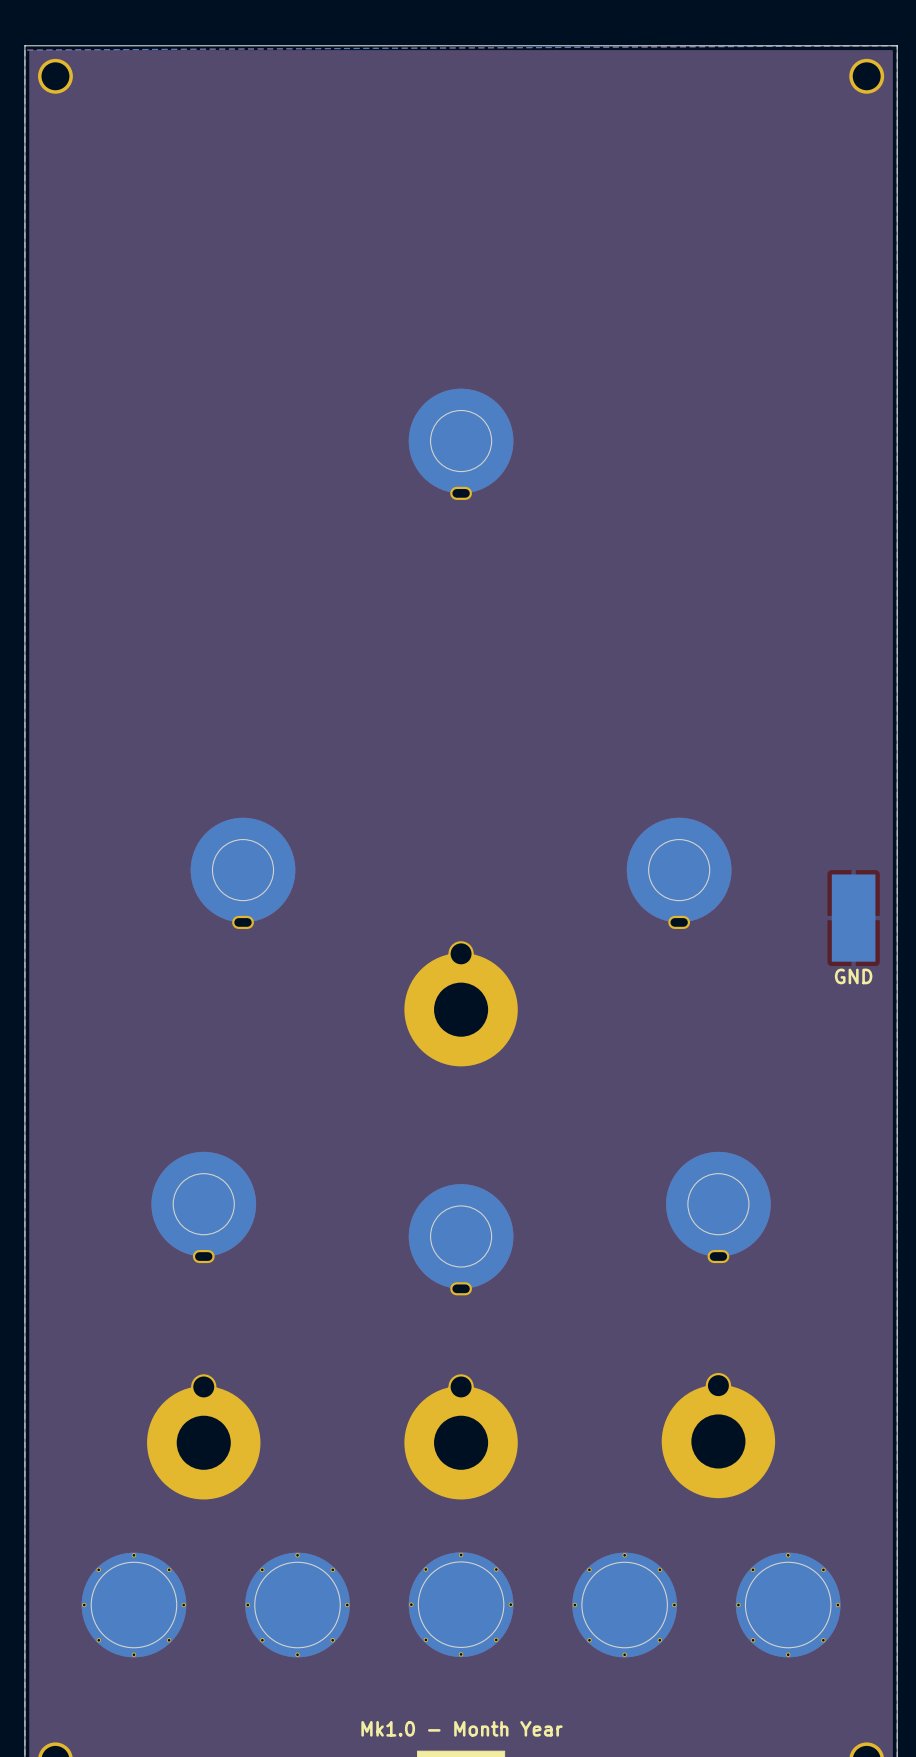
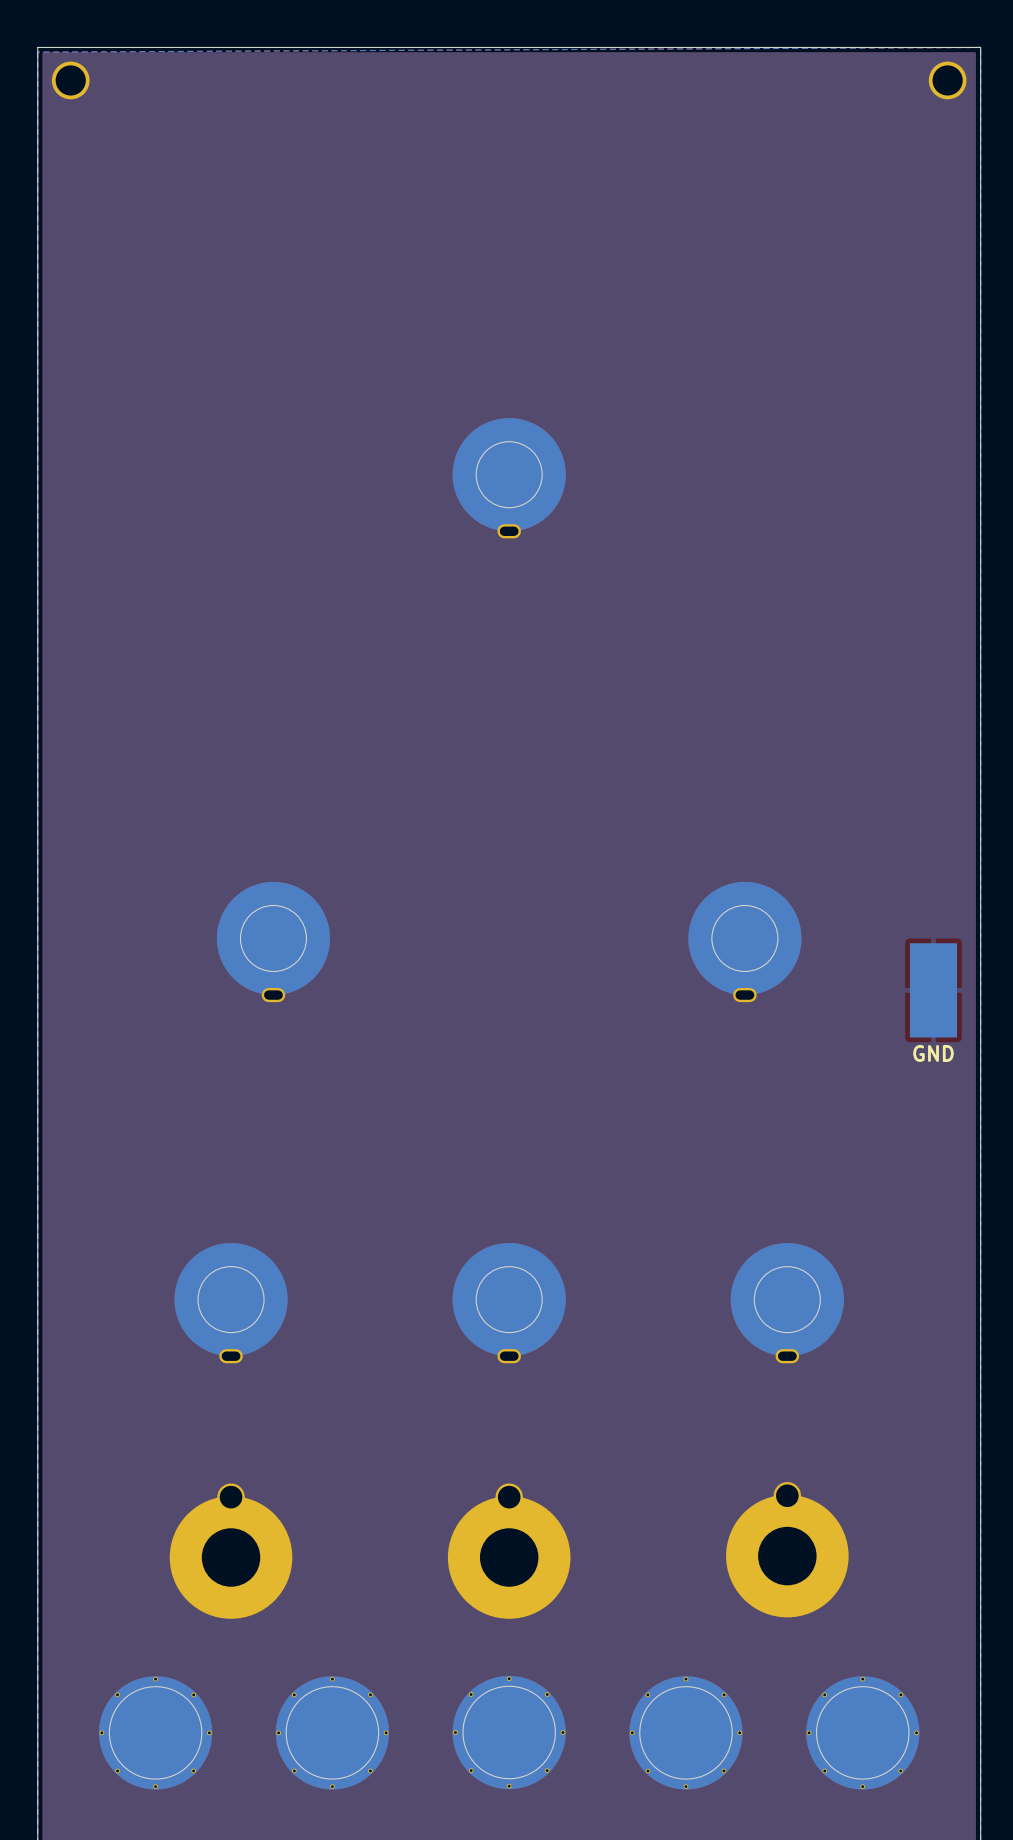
part: (461, 1003) -> none
part position: (461, 1239) -> (509, 1303)

